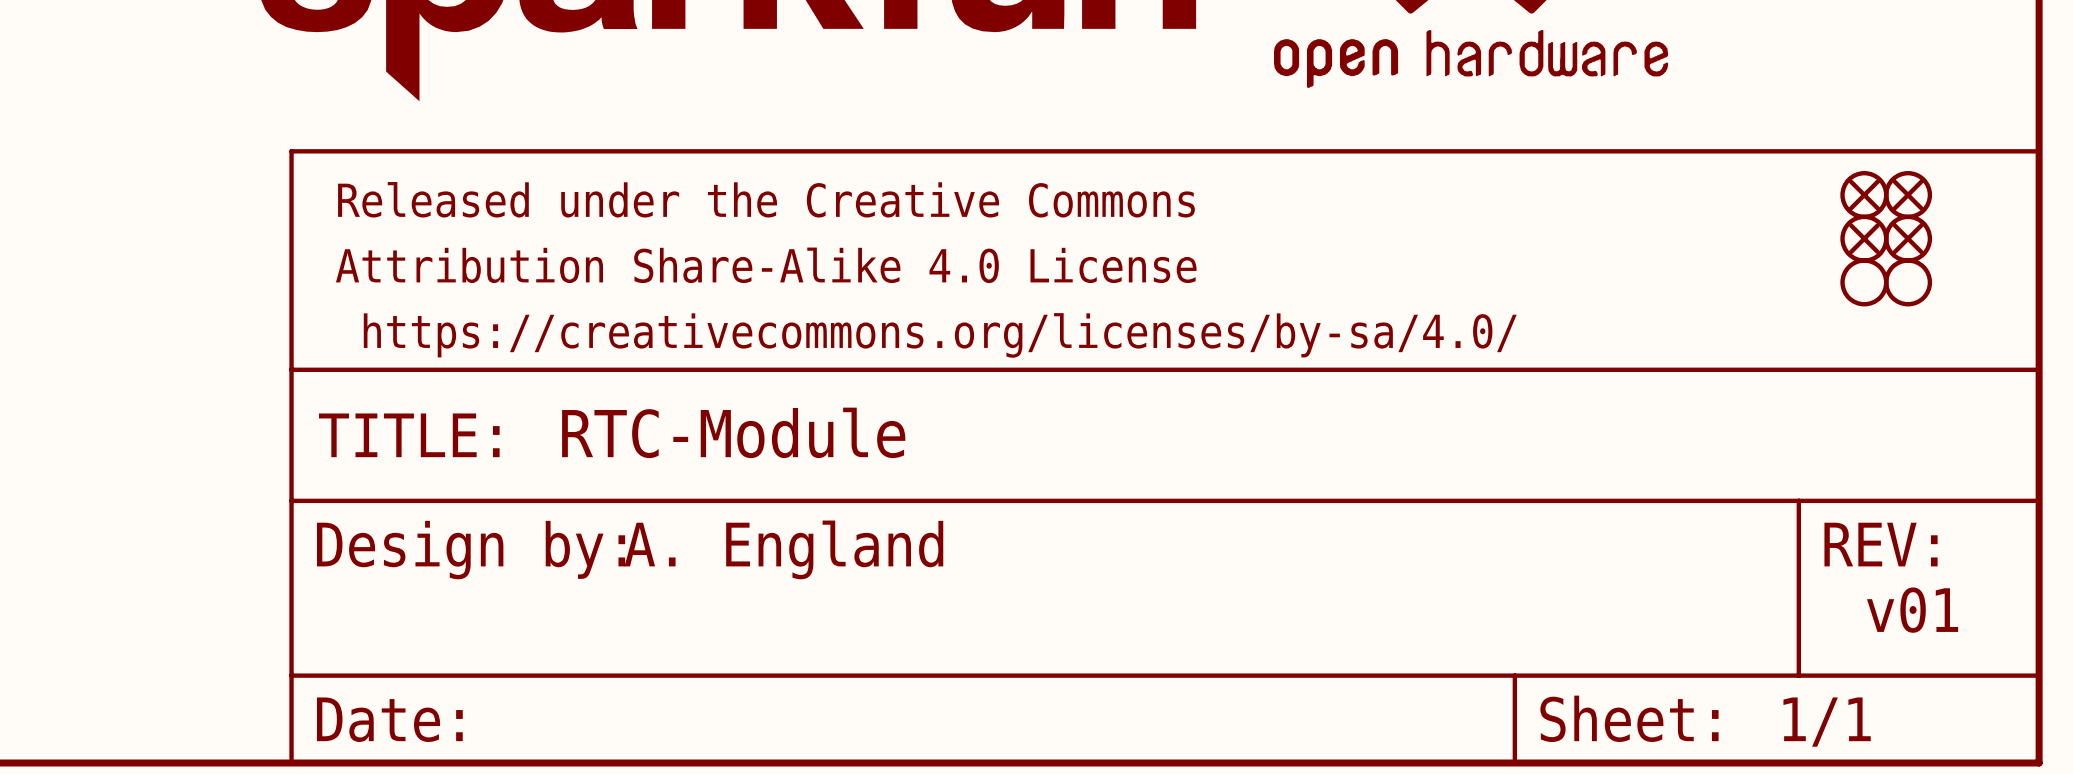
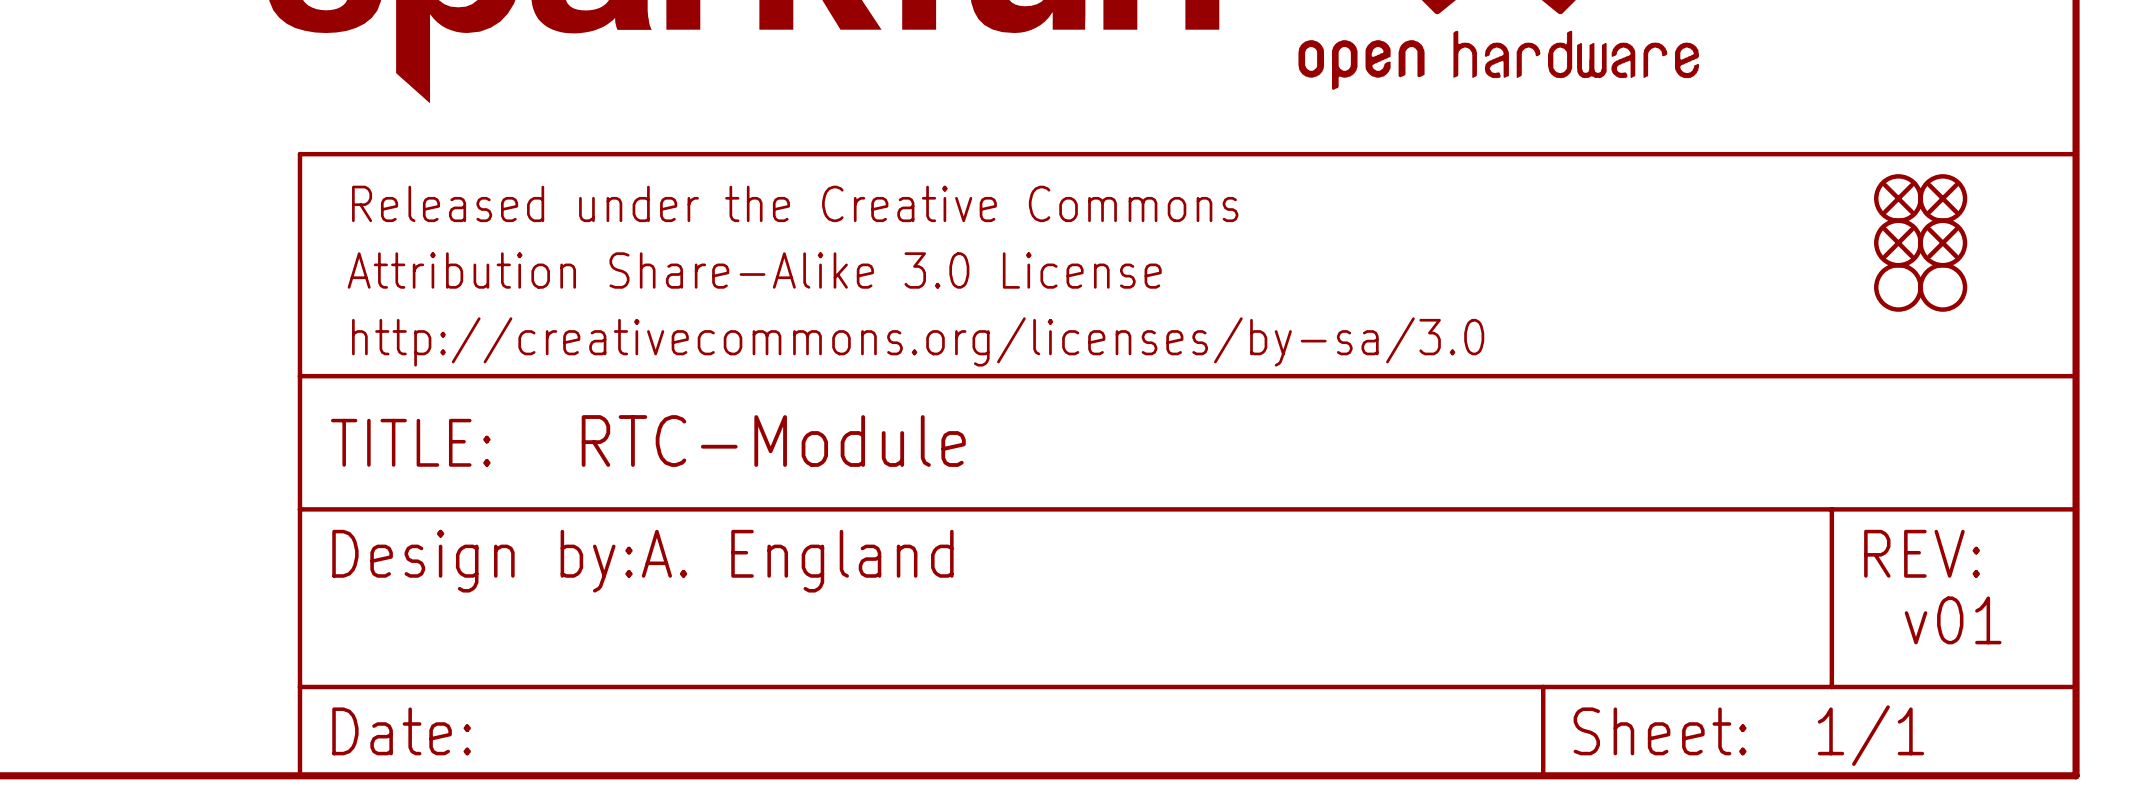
part text: Attribution Share-Alike 4.0 License (766, 265) -> Attribution Share-Alike 3.0 License (754, 270)
part text: https://creativecommons.org/licenses/by-sa/4.0/ (940, 335) -> http://creativecommons.org/licenses/by-sa/3.0 (918, 341)

